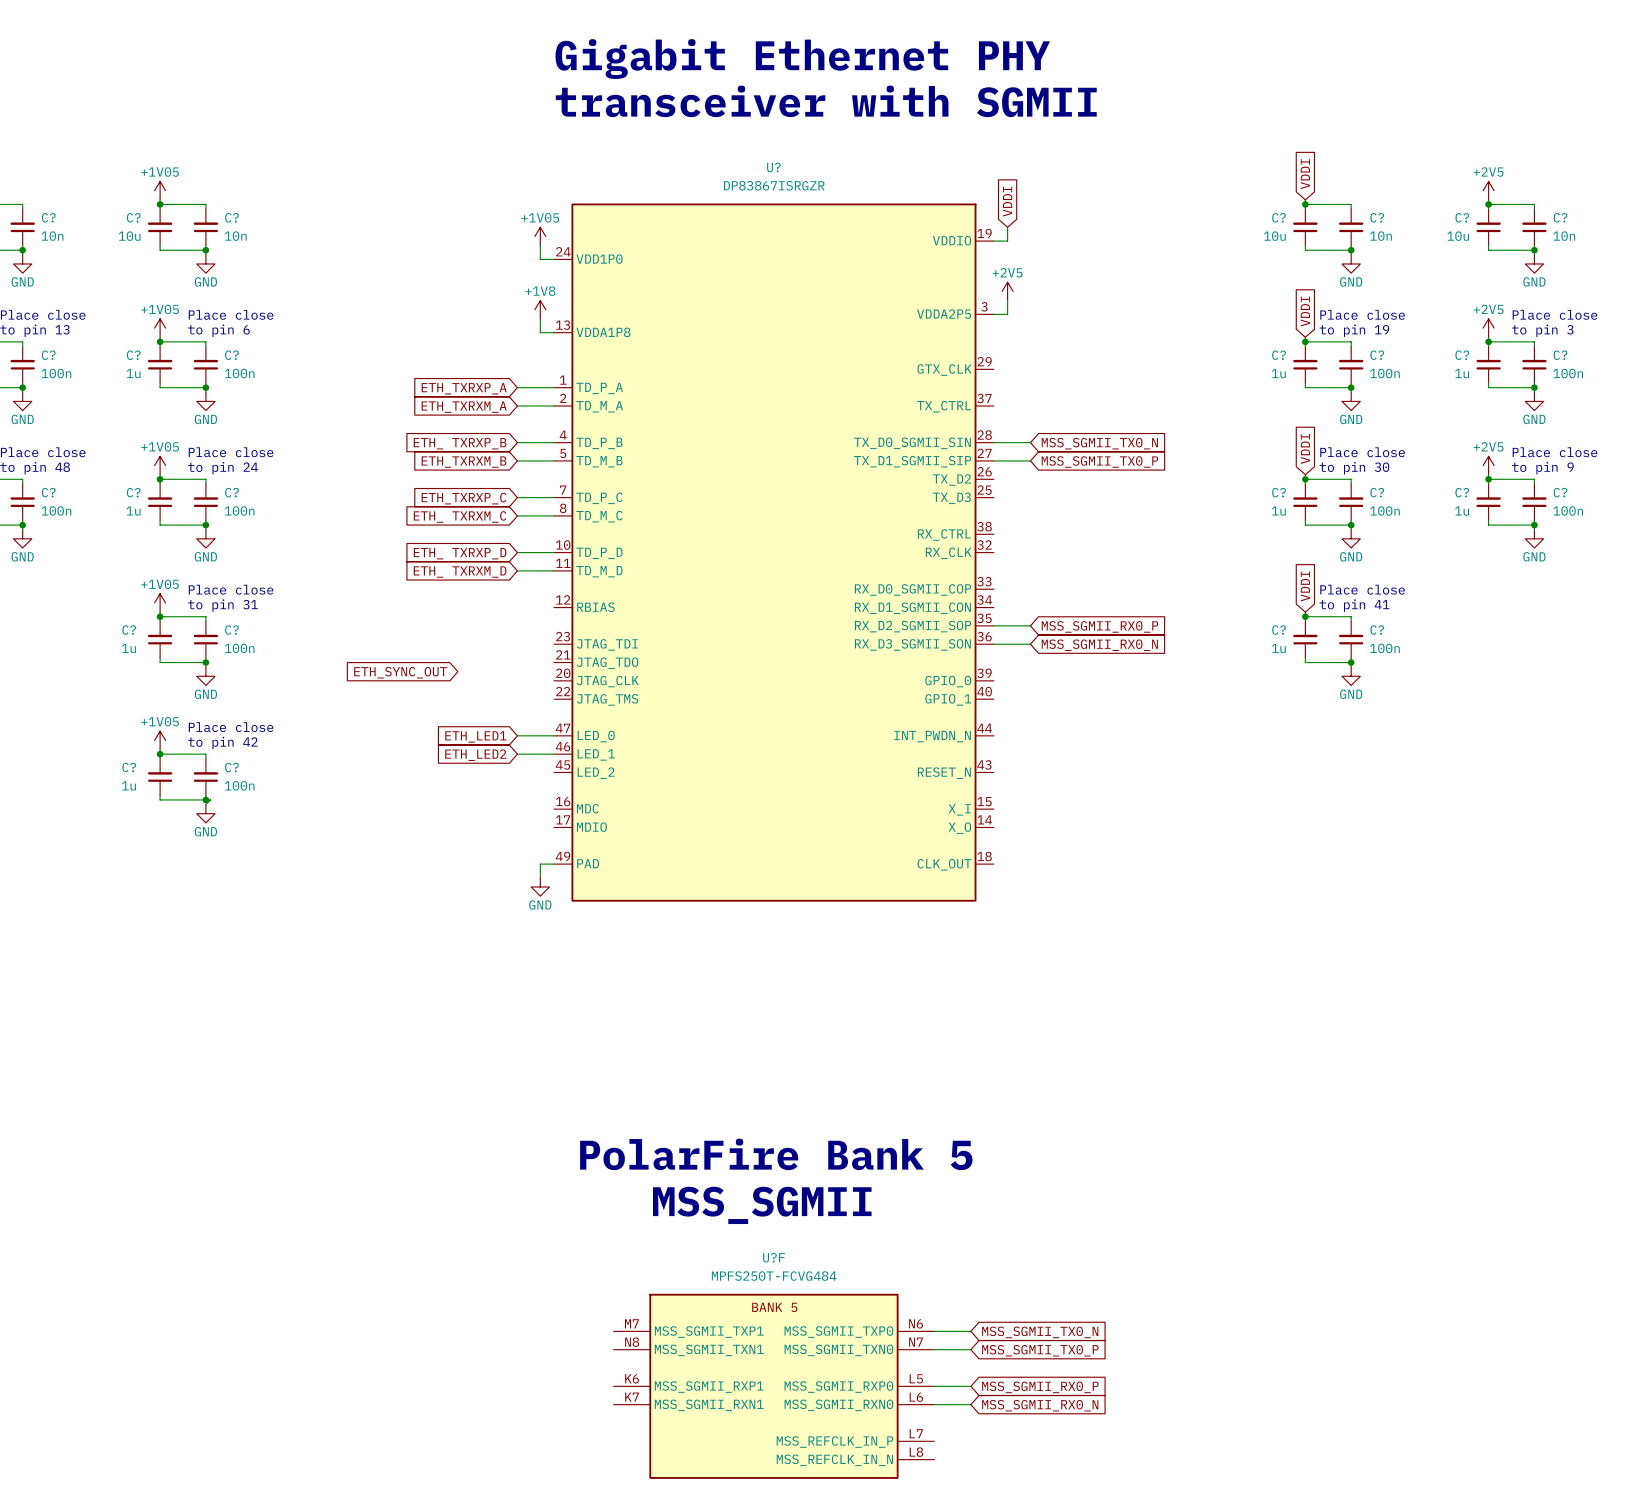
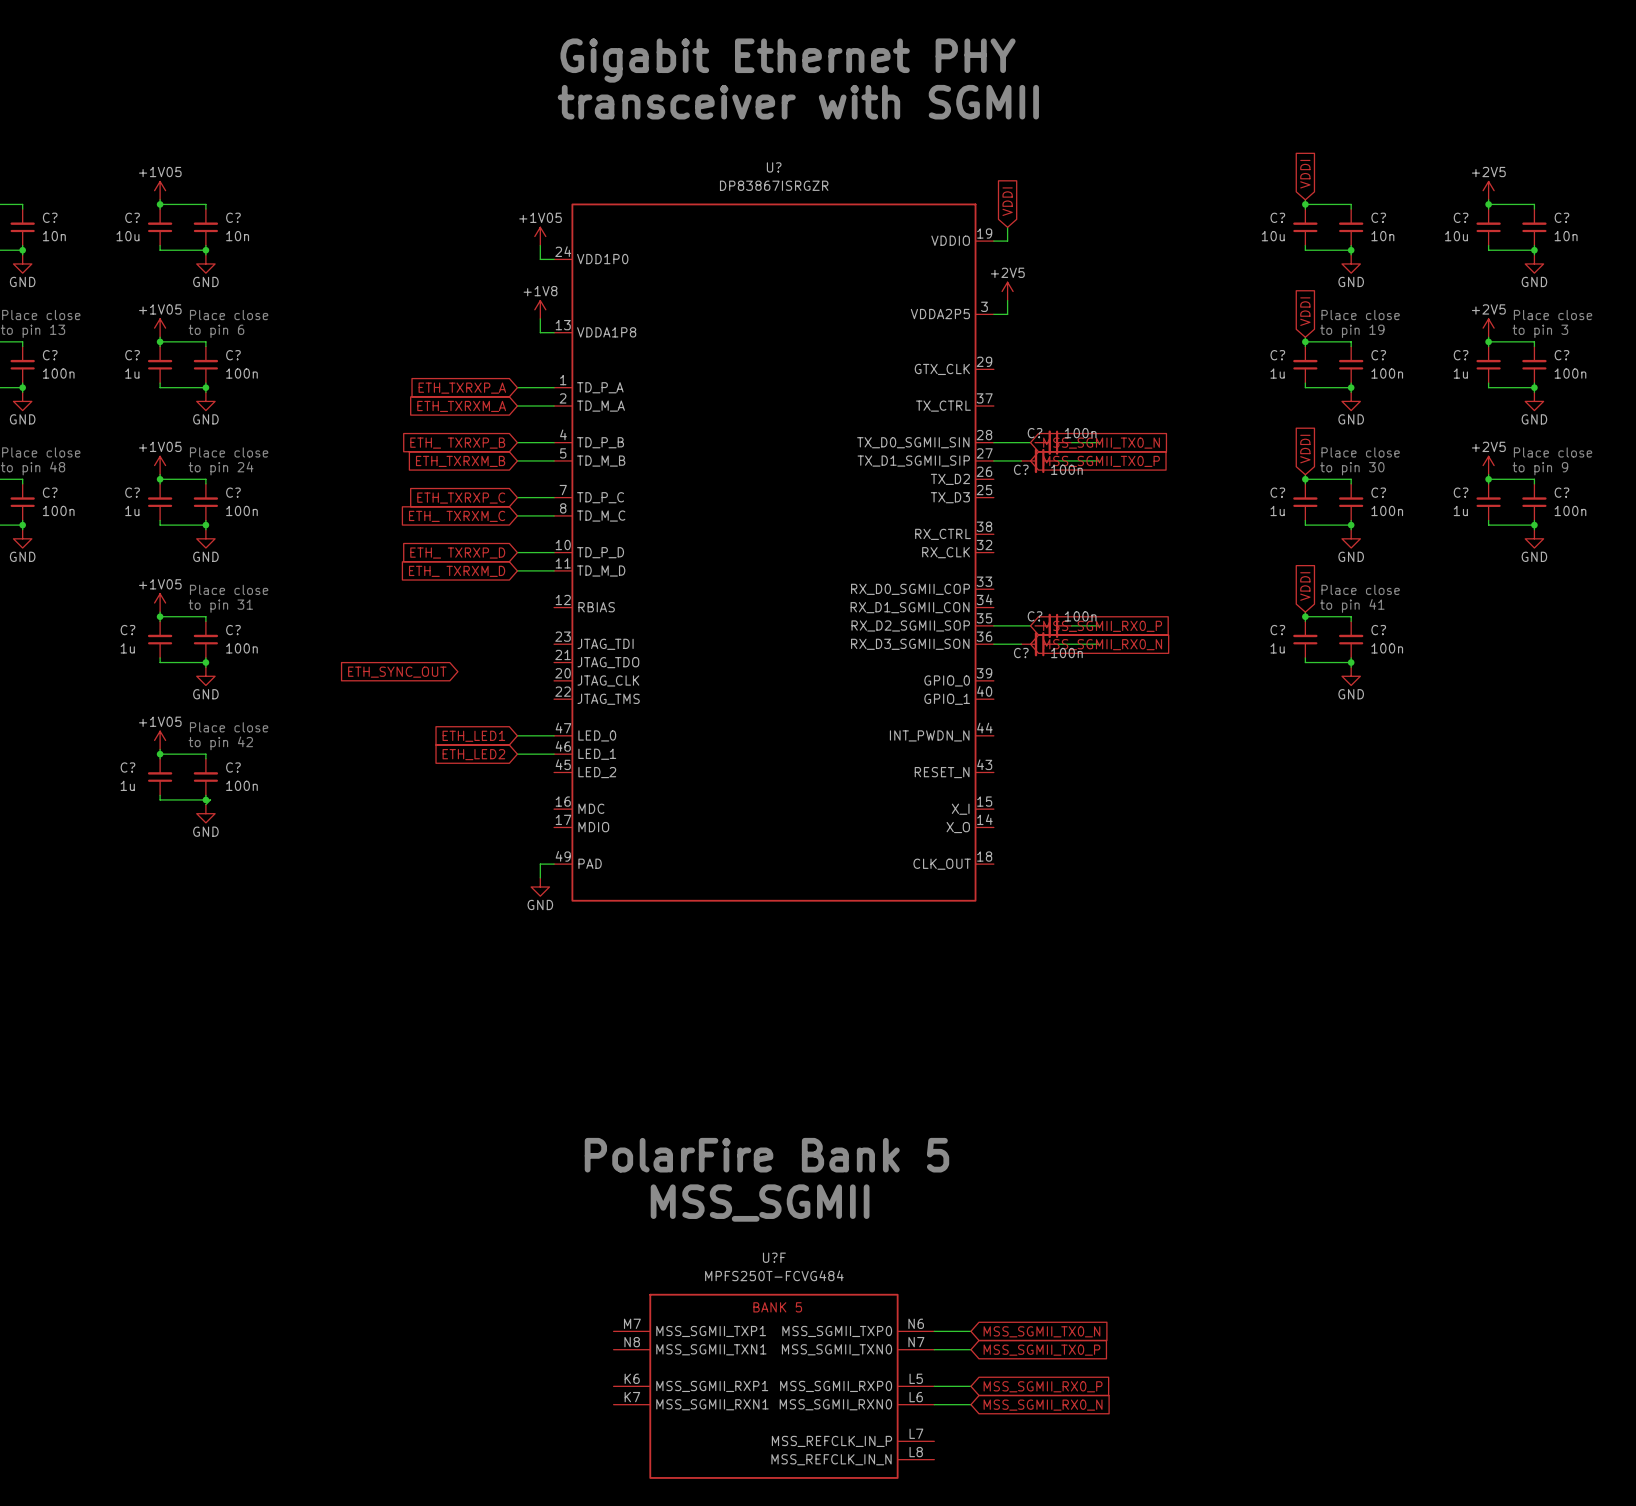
C?: none -> (1053, 442)
wire: none -> (1071, 442) (1099, 442)
C?: none -> (1039, 460)
wire: none -> (1057, 460) (1099, 460)
C?: none -> (1053, 625)
wire: none -> (1071, 625) (1099, 625)
C?: none -> (1039, 644)
wire: none -> (1057, 644) (1099, 644)

